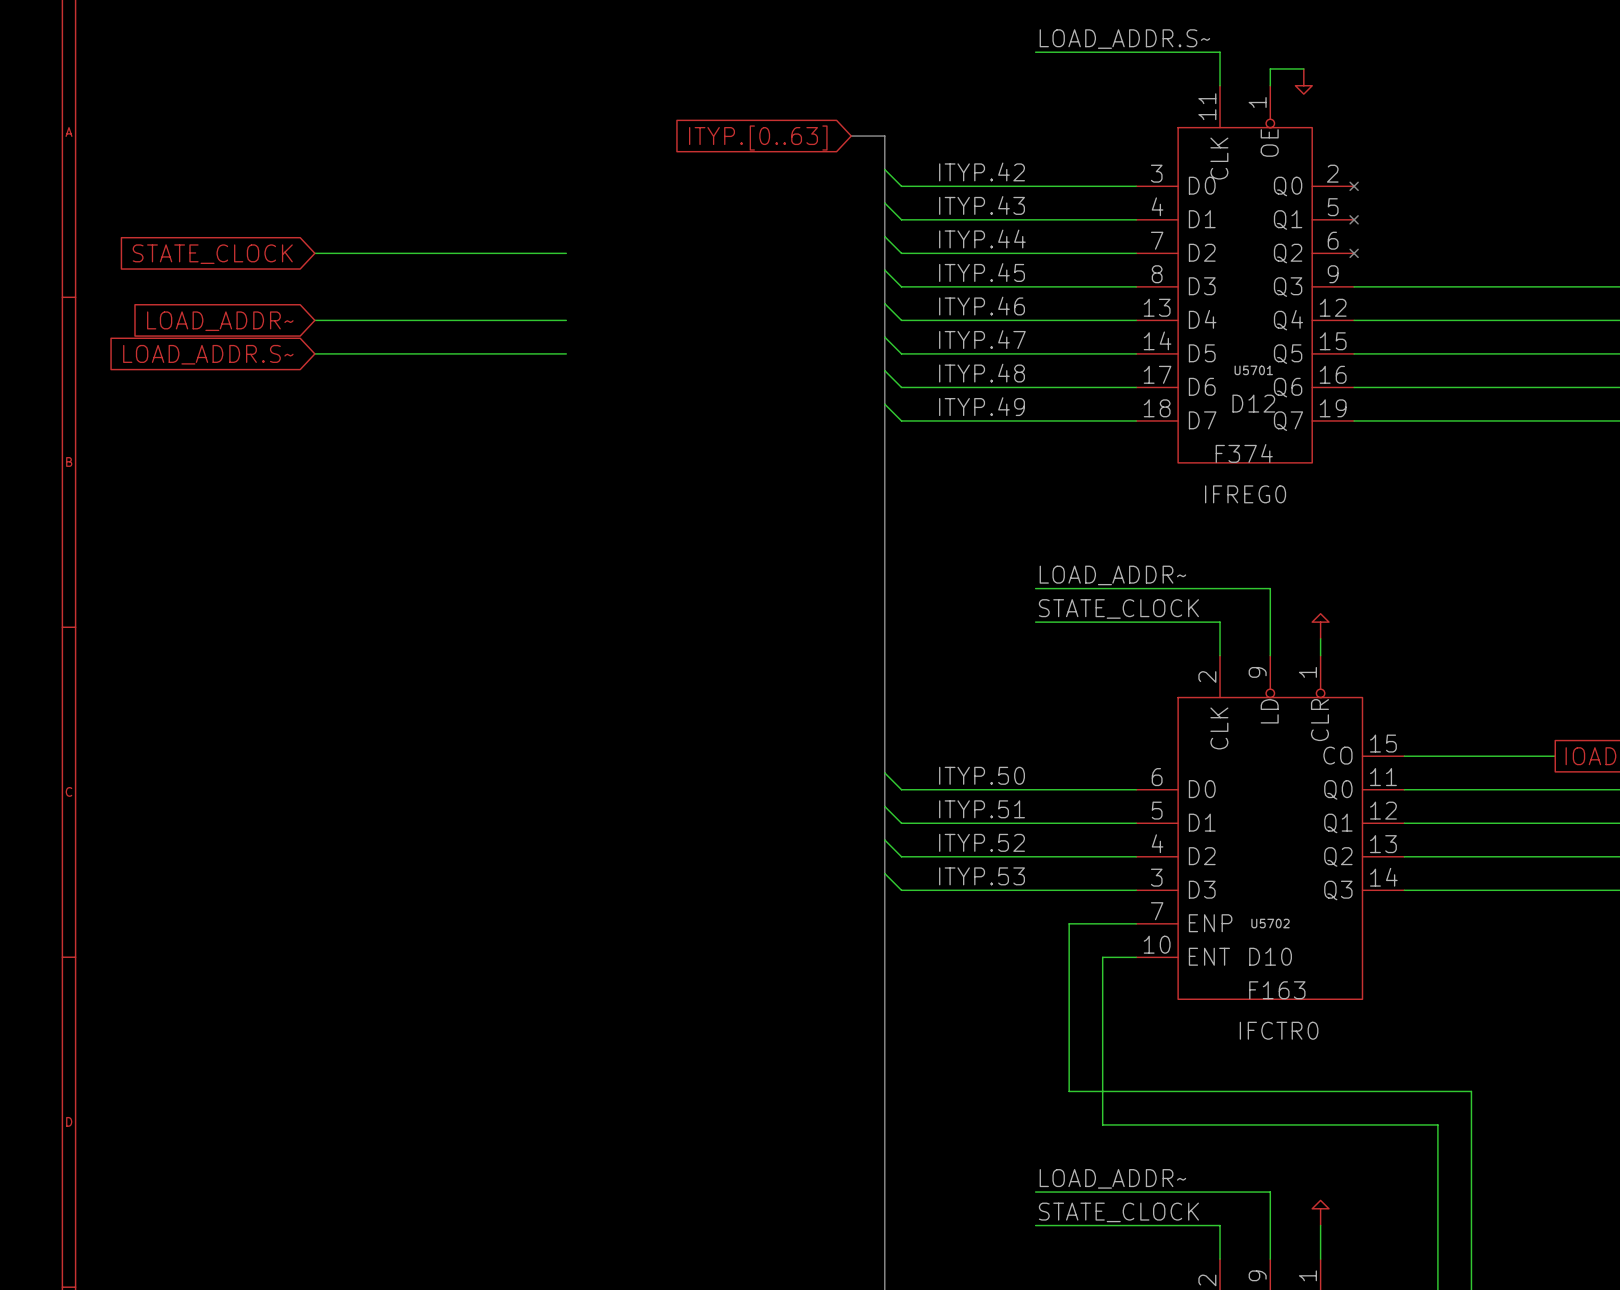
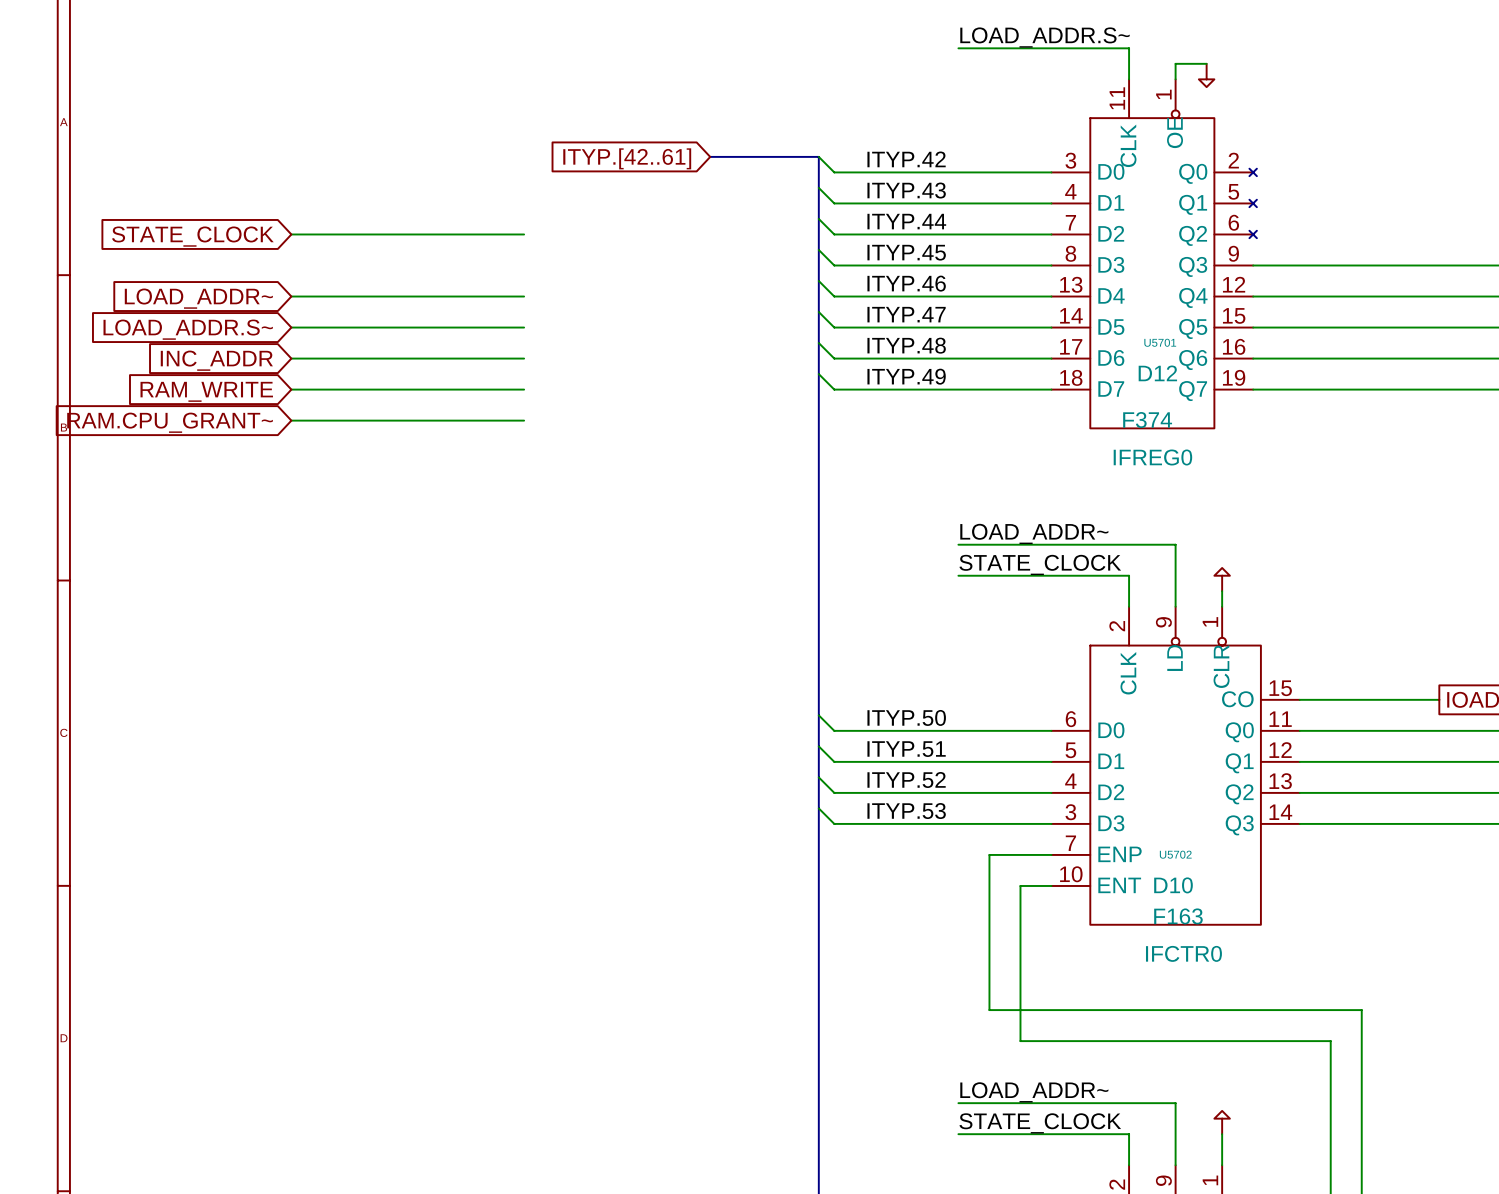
bus: (851, 136) (884, 136) (884, 169) -> (710, 156) (818, 156)
global label: ITYP.[0..63] (758, 138) -> ITYP.[42..61] (627, 158)
wire: none -> (291, 358) (524, 358)
global label: none -> INC_ADDR (216, 360)
wire: none -> (291, 389) (524, 389)
global label: none -> RAM_WRITE (206, 391)
wire: none -> (291, 420) (524, 420)
global label: none -> RAM.CPU_GRANT~ (170, 422)

